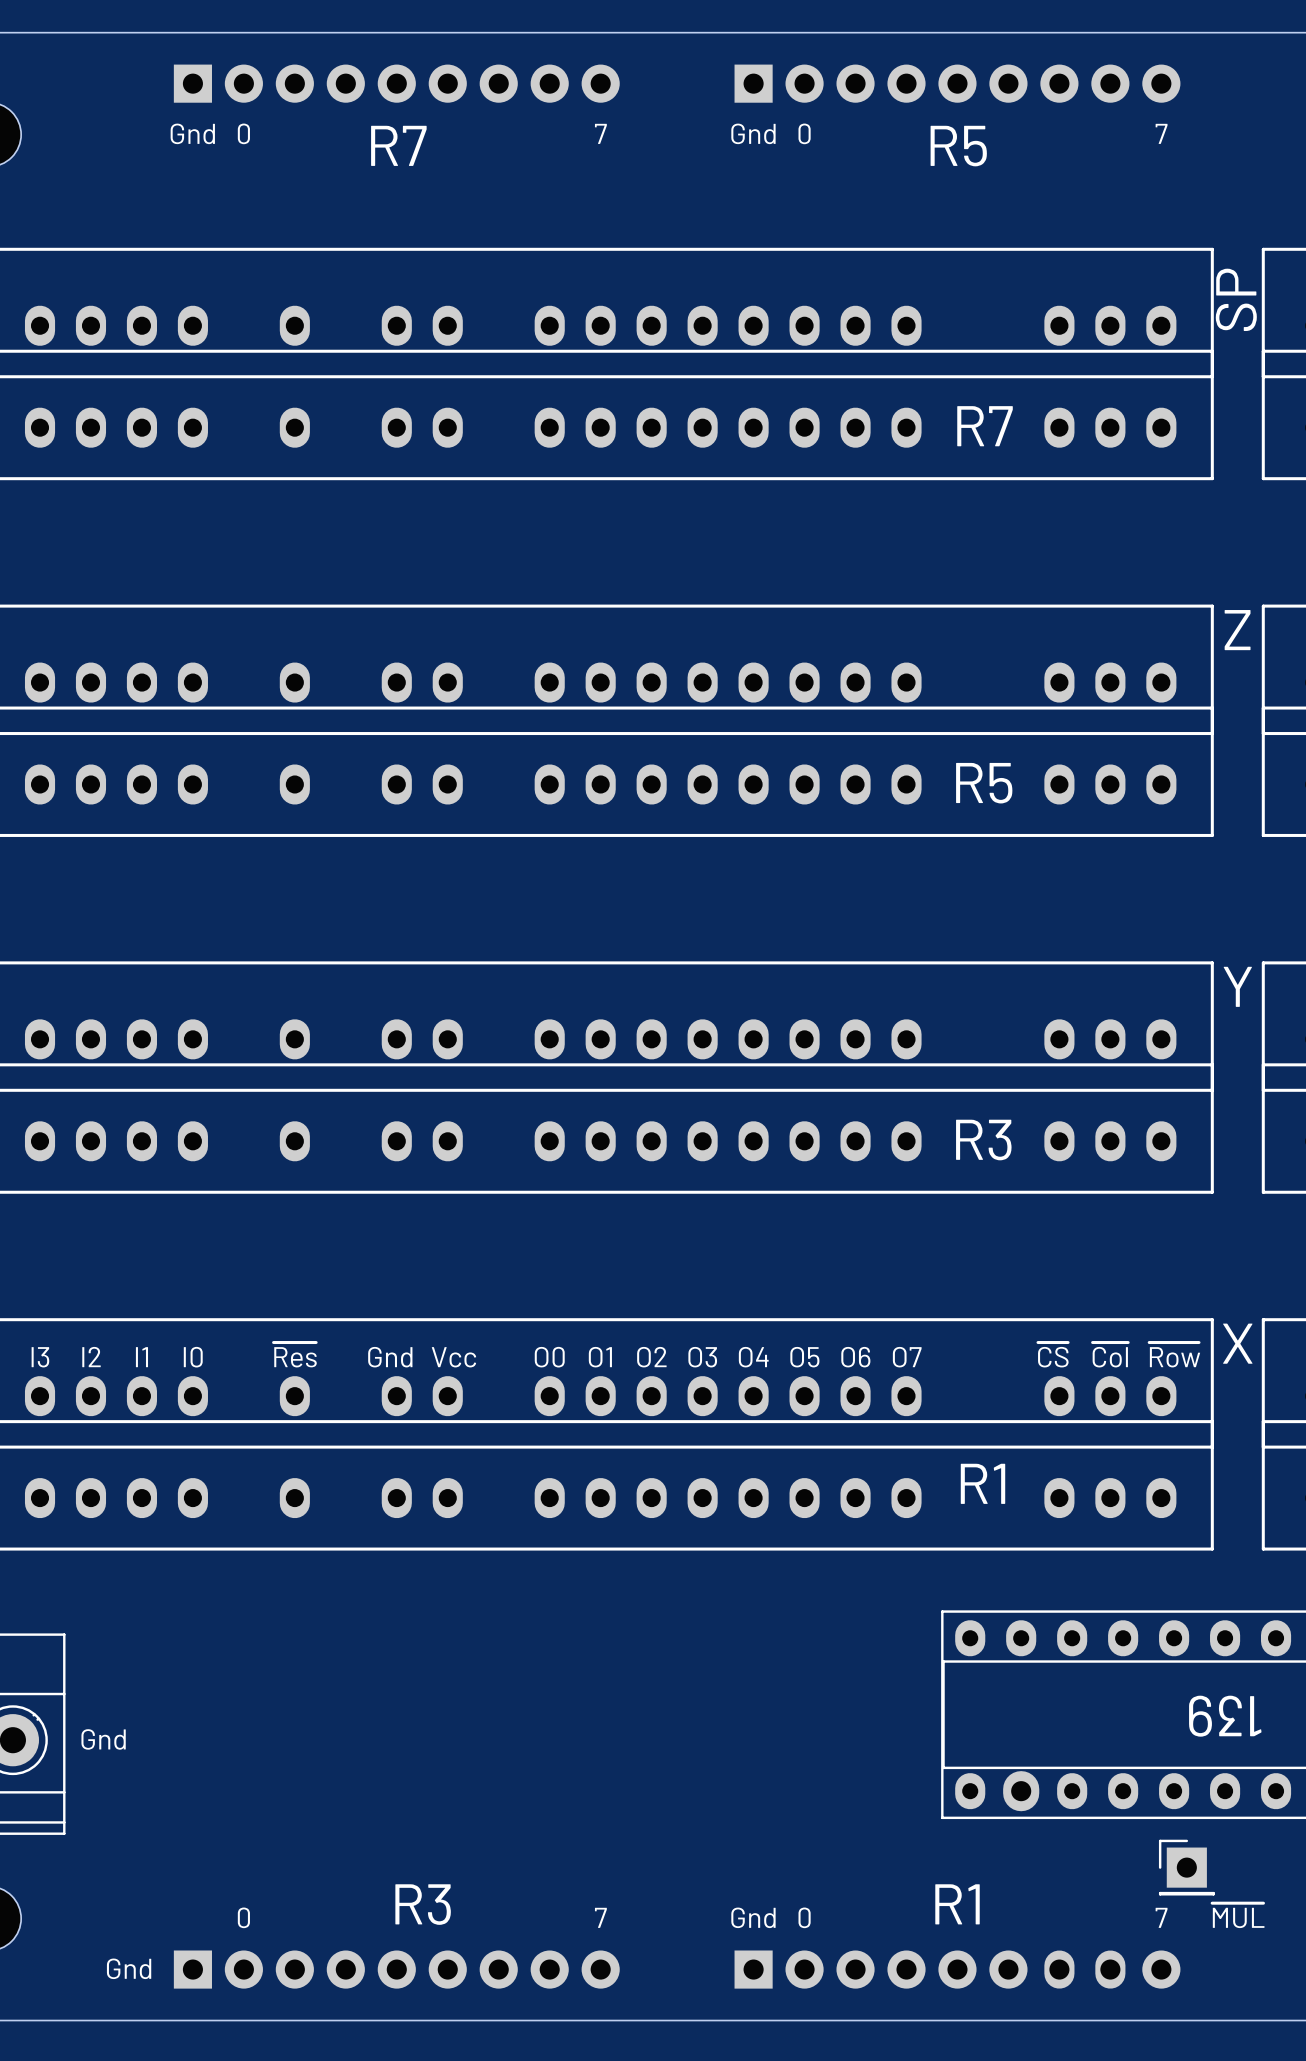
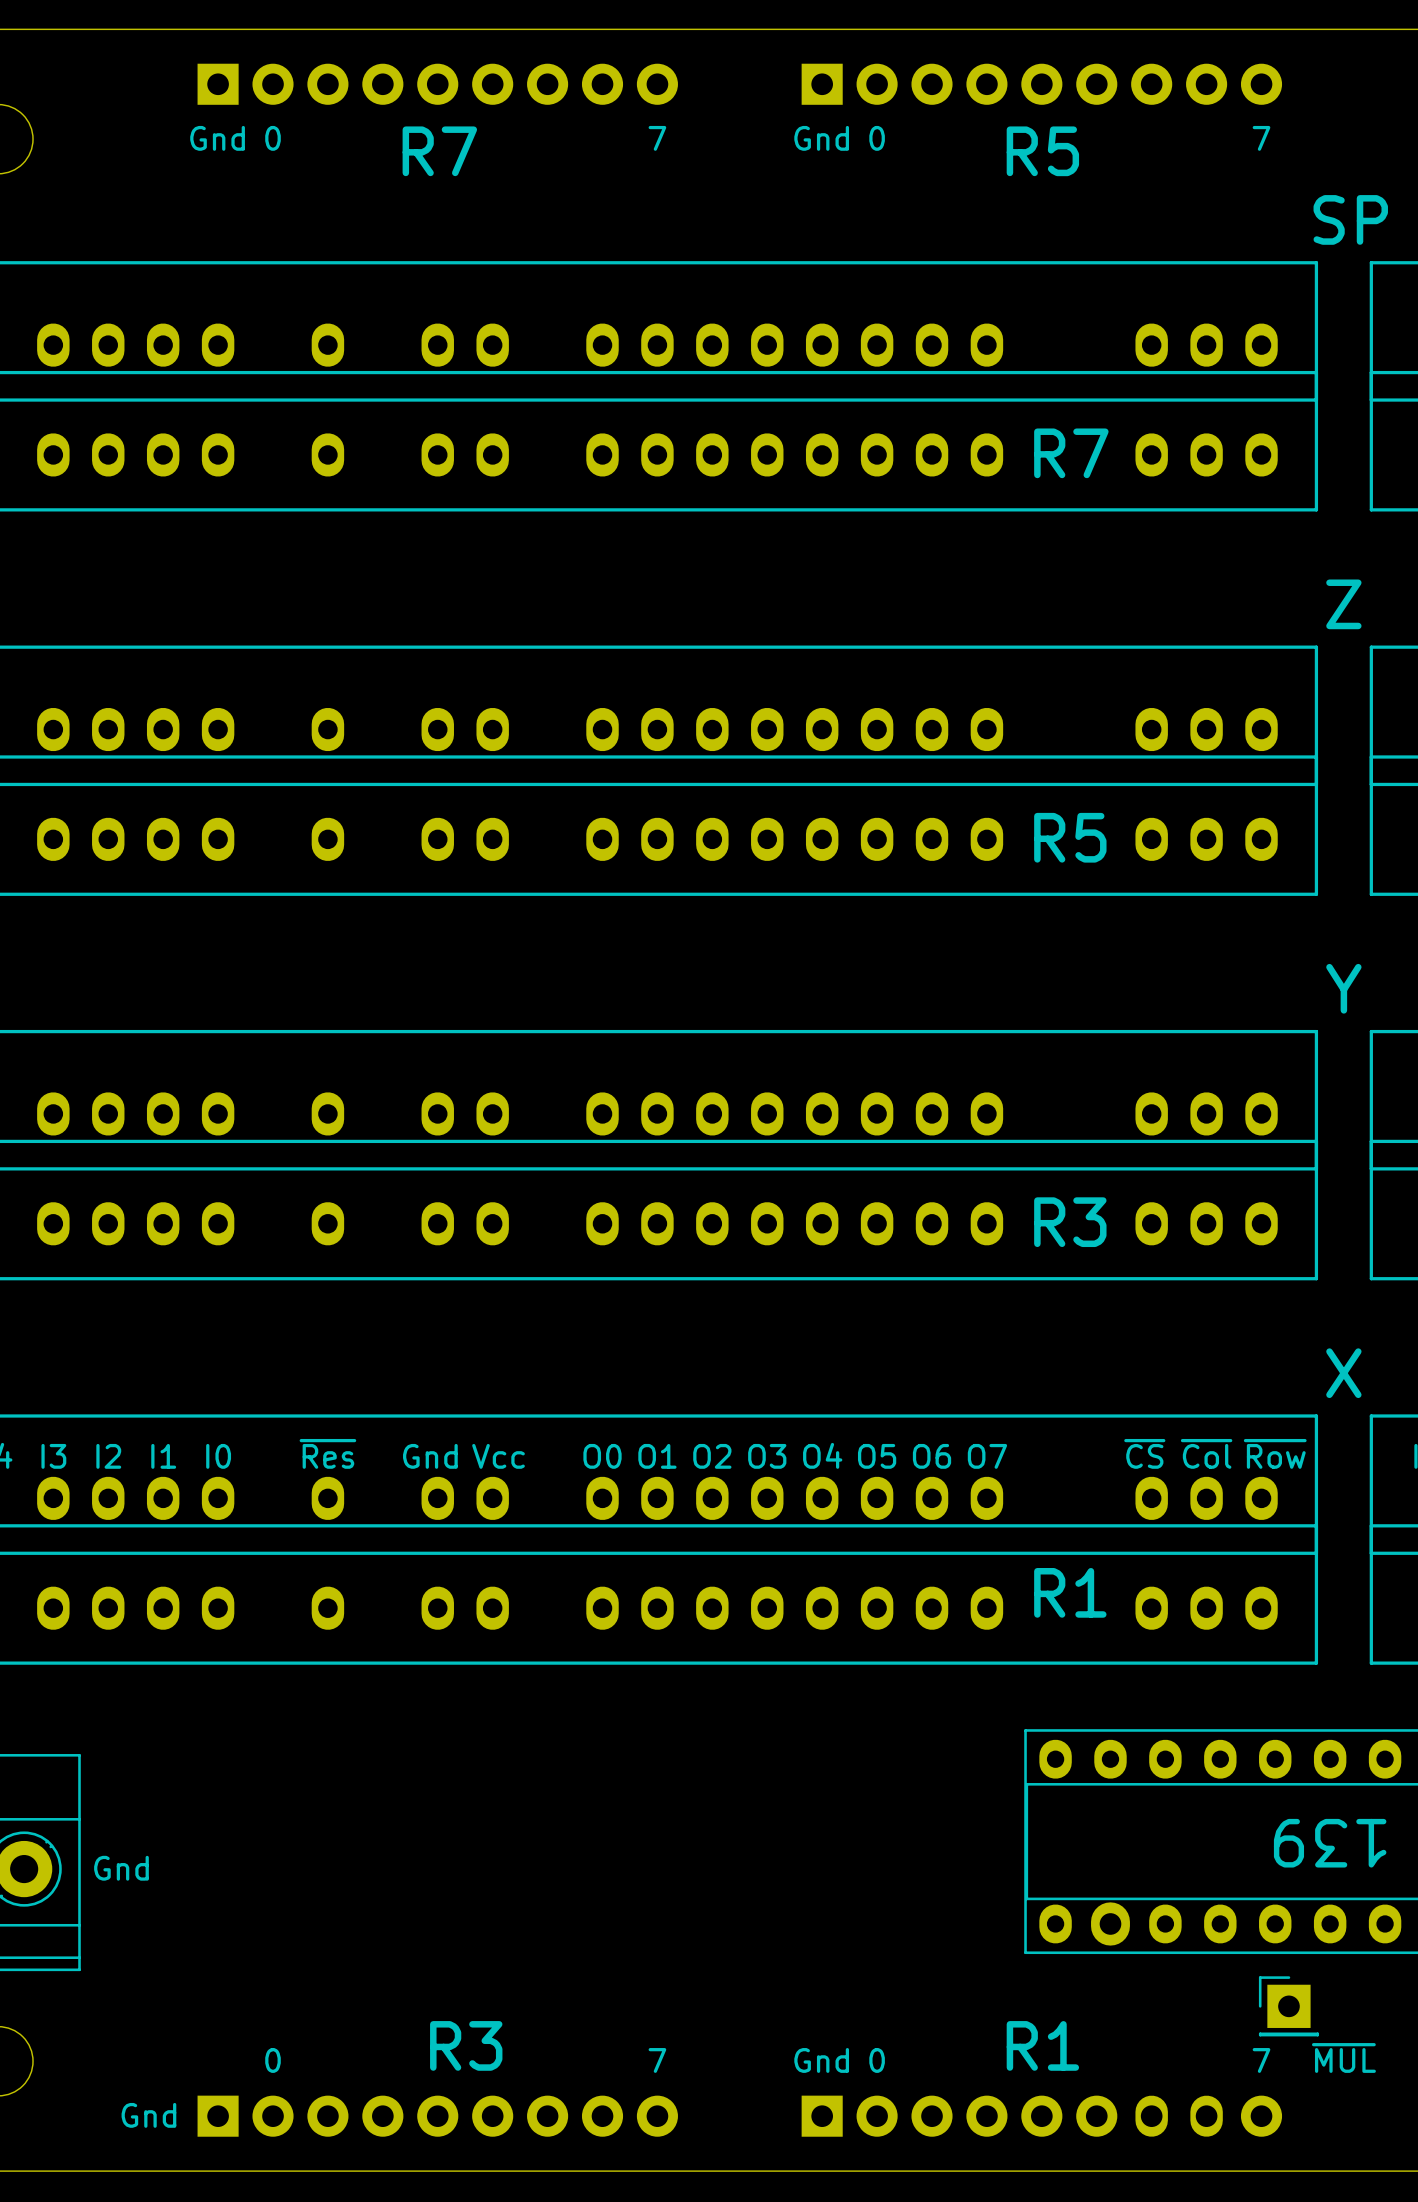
text rotation: 0° (1236, 299) -> 90° clockwise (1350, 219)
text position: Z (1237, 630) -> Z (1343, 604)
text position: Y (1237, 986) -> Y (1343, 988)
text position: X (1237, 1343) -> X (1343, 1373)

